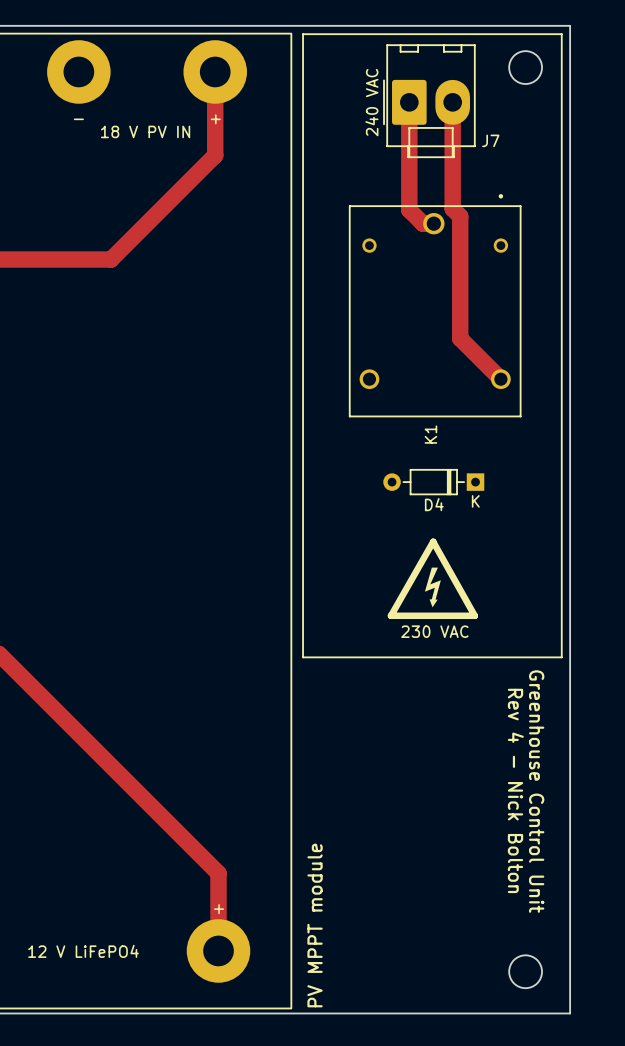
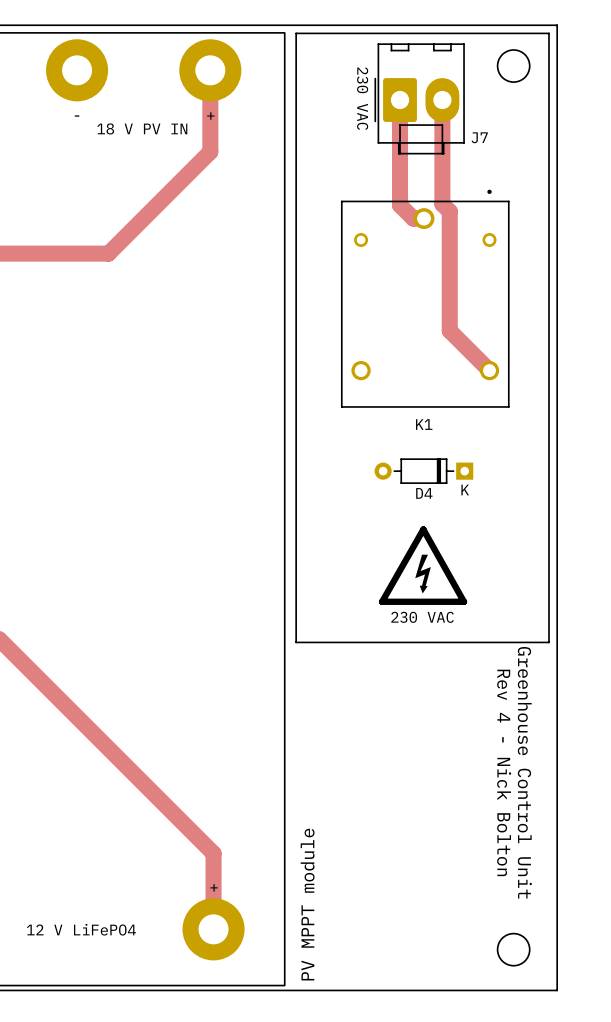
text: none -> 230 VAC (362, 98)
J7 text: 240 VAC (371, 102) -> none
K1 name rotation: 0° (430, 434) -> 90° clockwise (424, 424)

